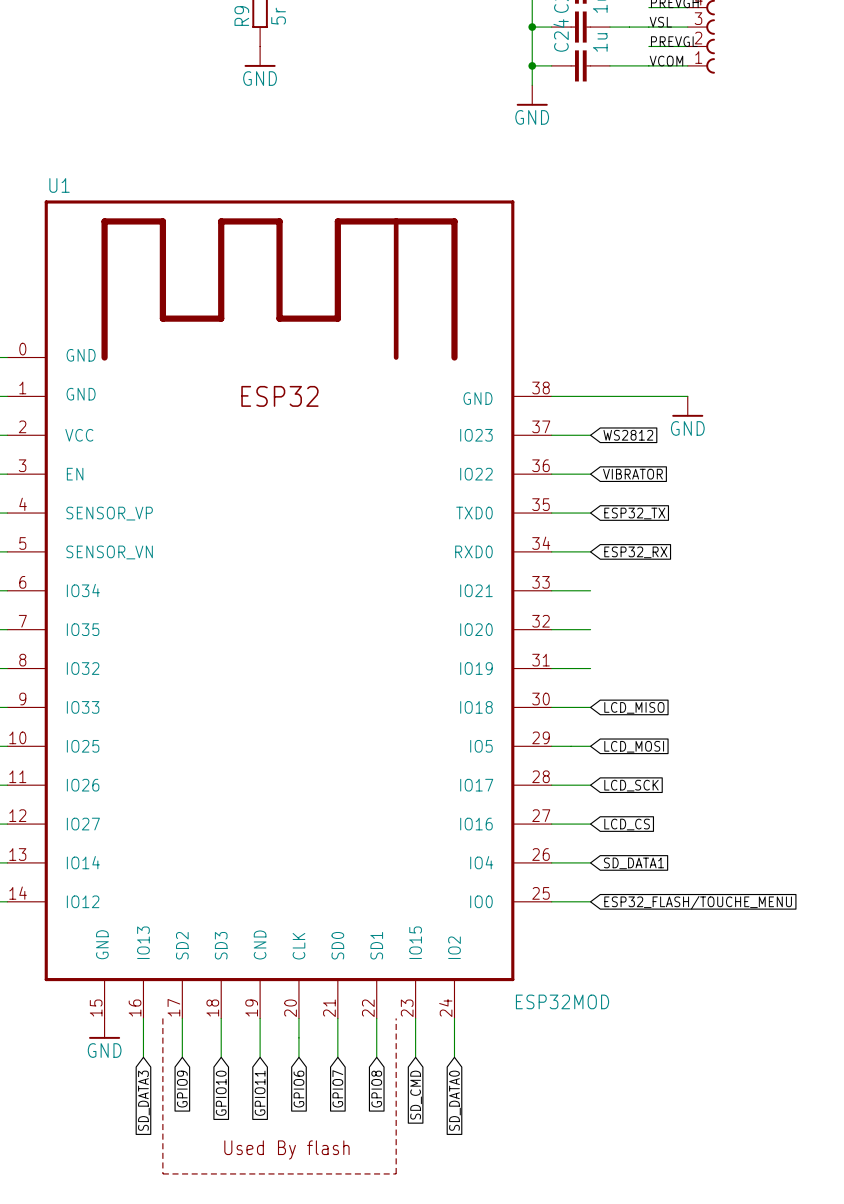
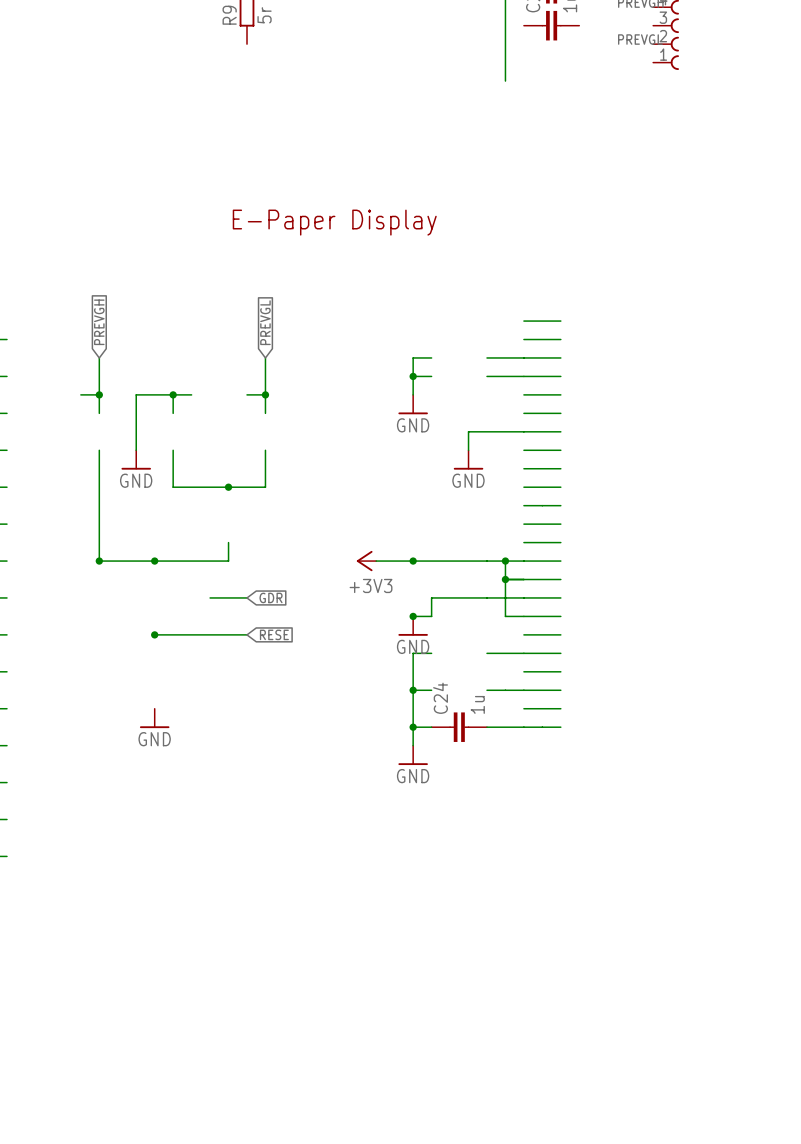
wire: (648, 7) (687, 7) -> none
label: VSL (660, 22) -> none
wire: (532, 27) (551, 27) -> none
junction: (532, 27) -> none
wire: (610, 27) (687, 27) -> none
wire: (648, 46) (687, 46) -> none
power symbol: GND (260, 56) -> none
label: VCOM (666, 61) -> none
wire: (532, 65) (551, 65) -> none
junction: (532, 65) -> none
C24 position: (580, 65) -> (459, 727)
wire: (610, 65) (687, 65) -> none
power symbol: GND (532, 95) -> none
text: none -> E-Paper Display (334, 222)
wire: none -> (523, 321) (560, 321)
global label: none -> PREVGH (99, 322)
global label: none -> PREVGL (265, 322)
wire: none -> (523, 339) (560, 339)
wire: none -> (99, 357) (99, 413)
wire: none -> (265, 357) (265, 413)
wire: none -> (431, 357) (413, 357) (413, 394)
wire: none -> (486, 357) (560, 357)
wire: none -> (413, 376) (431, 376)
junction: none -> (413, 376)
wire: (590, 396) (687, 396) -> none
power symbol: GND (687, 406) -> none
wire: none -> (80, 394) (99, 394)
junction: none -> (99, 394)
wire: none -> (173, 394) (173, 413)
junction: none -> (173, 394)
wire: none -> (191, 394) (136, 394) (136, 450)
wire: none -> (247, 394) (265, 394)
junction: none -> (265, 394)
wire: none -> (523, 394) (560, 394)
power symbol: none -> GND (413, 404)
global label: WS2812 (628, 435) -> none
wire: none -> (560, 431) (468, 431) (468, 450)
wire: none -> (99, 450) (99, 561) (228, 561) (228, 542)
wire: none -> (173, 450) (173, 487) (265, 487) (265, 450)
global label: VIBRATOR (632, 474) -> none
power symbol: none -> GND (136, 459)
power symbol: none -> GND (468, 459)
wire: none -> (523, 468) (560, 468)
junction: none -> (228, 487)
global label: ESP32_TX (634, 513) -> none
wire: none -> (523, 505) (560, 505)
global label: ESP32_RX (635, 552) -> none
wire: none -> (523, 542) (560, 542)
junction: none -> (99, 561)
junction: none -> (154, 561)
power symbol: none -> +3V3 (366, 561)
wire: none -> (376, 561) (523, 561)
junction: none -> (413, 561)
wire: none -> (505, 561) (505, 616) (560, 616)
junction: none -> (505, 561)
U1: ESP32MOD (279, 609) -> none
wire: none -> (505, 579) (560, 579)
junction: none -> (505, 579)
wire: none -> (210, 597) (247, 597)
global label: none -> GDR (271, 597)
wire: none -> (523, 597) (431, 597) (431, 616) (413, 616)
junction: none -> (413, 616)
power symbol: none -> GND (413, 626)
wire: none -> (154, 634) (247, 634)
junction: none -> (154, 634)
global label: none -> RESE (274, 634)
wire: none -> (431, 653) (413, 653) (413, 745)
wire: none -> (486, 653) (560, 653)
global label: LCD_MISO (634, 707) -> none
wire: none -> (413, 690) (431, 690)
junction: none -> (413, 690)
wire: none -> (486, 690) (560, 690)
global label: LCD_MOSI (634, 746) -> none
power symbol: none -> GND (154, 718)
wire: none -> (413, 727) (431, 727)
junction: none -> (413, 727)
wire: none -> (486, 727) (560, 727)
wire: (551, 785) (590, 785) -> none
global label: LCD_SCK (631, 785) -> none
power symbol: none -> GND (413, 755)
wire: (551, 824) (590, 824) -> none
global label: LCD_CS (627, 824) -> none
wire: (551, 862) (590, 862) -> none
global label: SD_DATA1 (633, 863) -> none
wire: (551, 901) (590, 901) -> none
global label: ESP32_FLASH/TOUCHE_MENU (698, 902) -> none
wire: (143, 1018) (143, 1057) -> none
line: (162, 1018) (162, 1173) (396, 1173) (396, 1018) -> none
wire: (182, 1018) (182, 1057) -> none
wire: (221, 1018) (221, 1057) -> none
wire: (260, 1018) (260, 1057) -> none
wire: (298, 1018) (298, 1057) -> none
wire: (337, 1018) (337, 1057) -> none
wire: (376, 1018) (376, 1057) -> none
wire: (415, 1018) (415, 1057) -> none
wire: (454, 1018) (454, 1057) -> none
power symbol: GND (104, 1028) -> none
global label: GPIO7 (337, 1088) -> none
global label: GPIO9 (182, 1089) -> none
global label: GPIO6 (298, 1089) -> none
global label: GPIO8 (376, 1089) -> none
global label: GPIO10 (221, 1093) -> none
global label: GPIO11 (260, 1093) -> none
global label: SD_CMD (416, 1095) -> none
global label: SD_DATA3 (143, 1100) -> none
global label: SD_DATA0 (454, 1100) -> none
text: Used By flash (286, 1149) -> none

